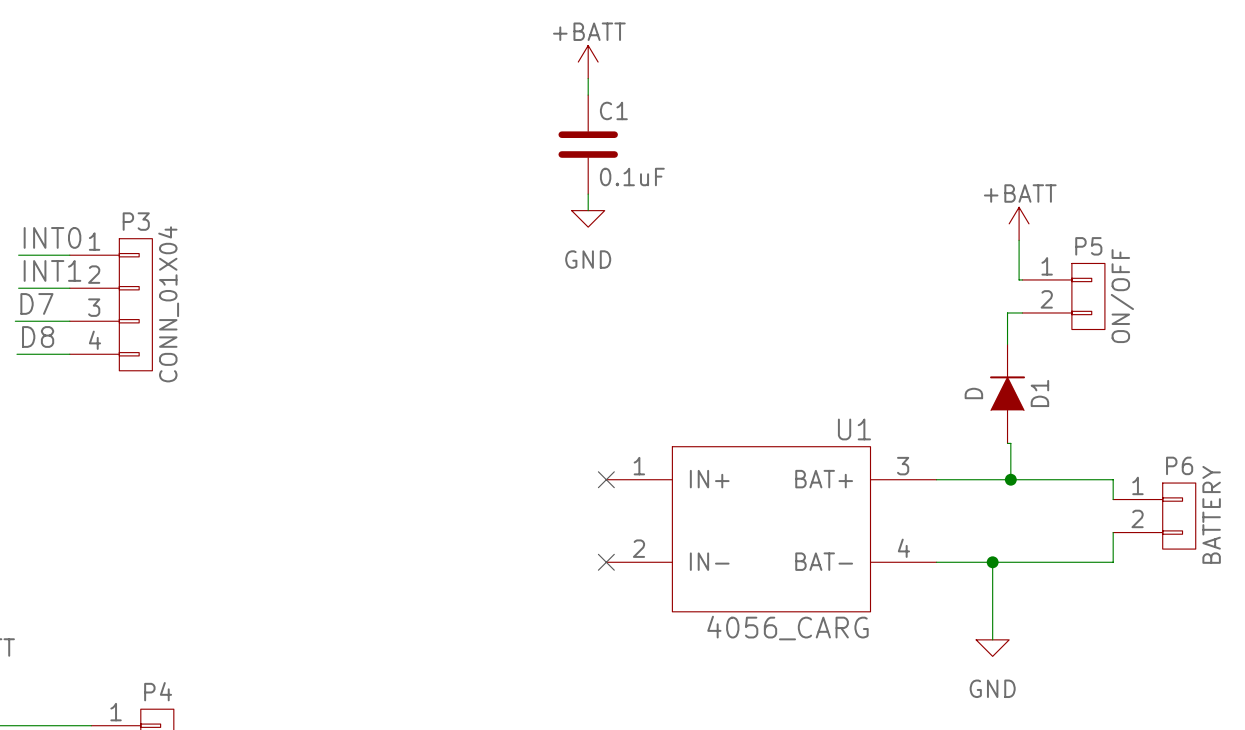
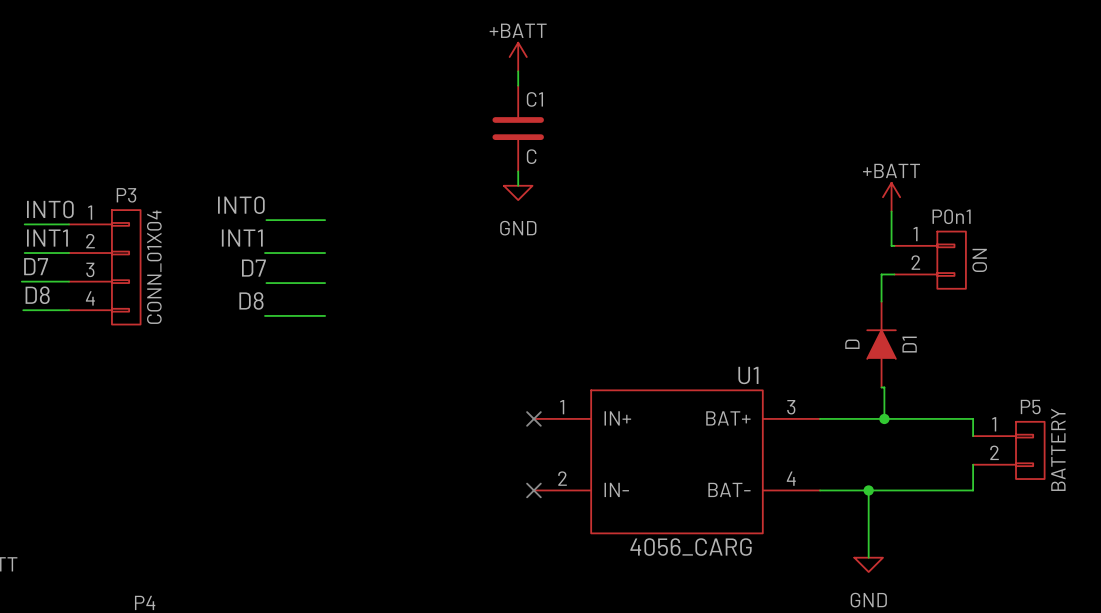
C1 value: 0.1uF (632, 177) -> C (531, 156)
label: none -> INT0 (241, 205)
P5 name: P5 (1088, 246) -> P0n1 (951, 216)
wire: none -> (266, 220) (325, 220)
label: none -> INT1 (242, 238)
wire: none -> (265, 253) (325, 253)
P5 value: ON/OFF (1122, 296) -> ON (979, 260)
label: none -> D7 (253, 268)
wire: none -> (266, 283) (325, 283)
label: none -> D8 (251, 300)
wire: none -> (265, 315) (325, 315)
P6 name: P6 (1179, 465) -> P5 (1030, 407)

